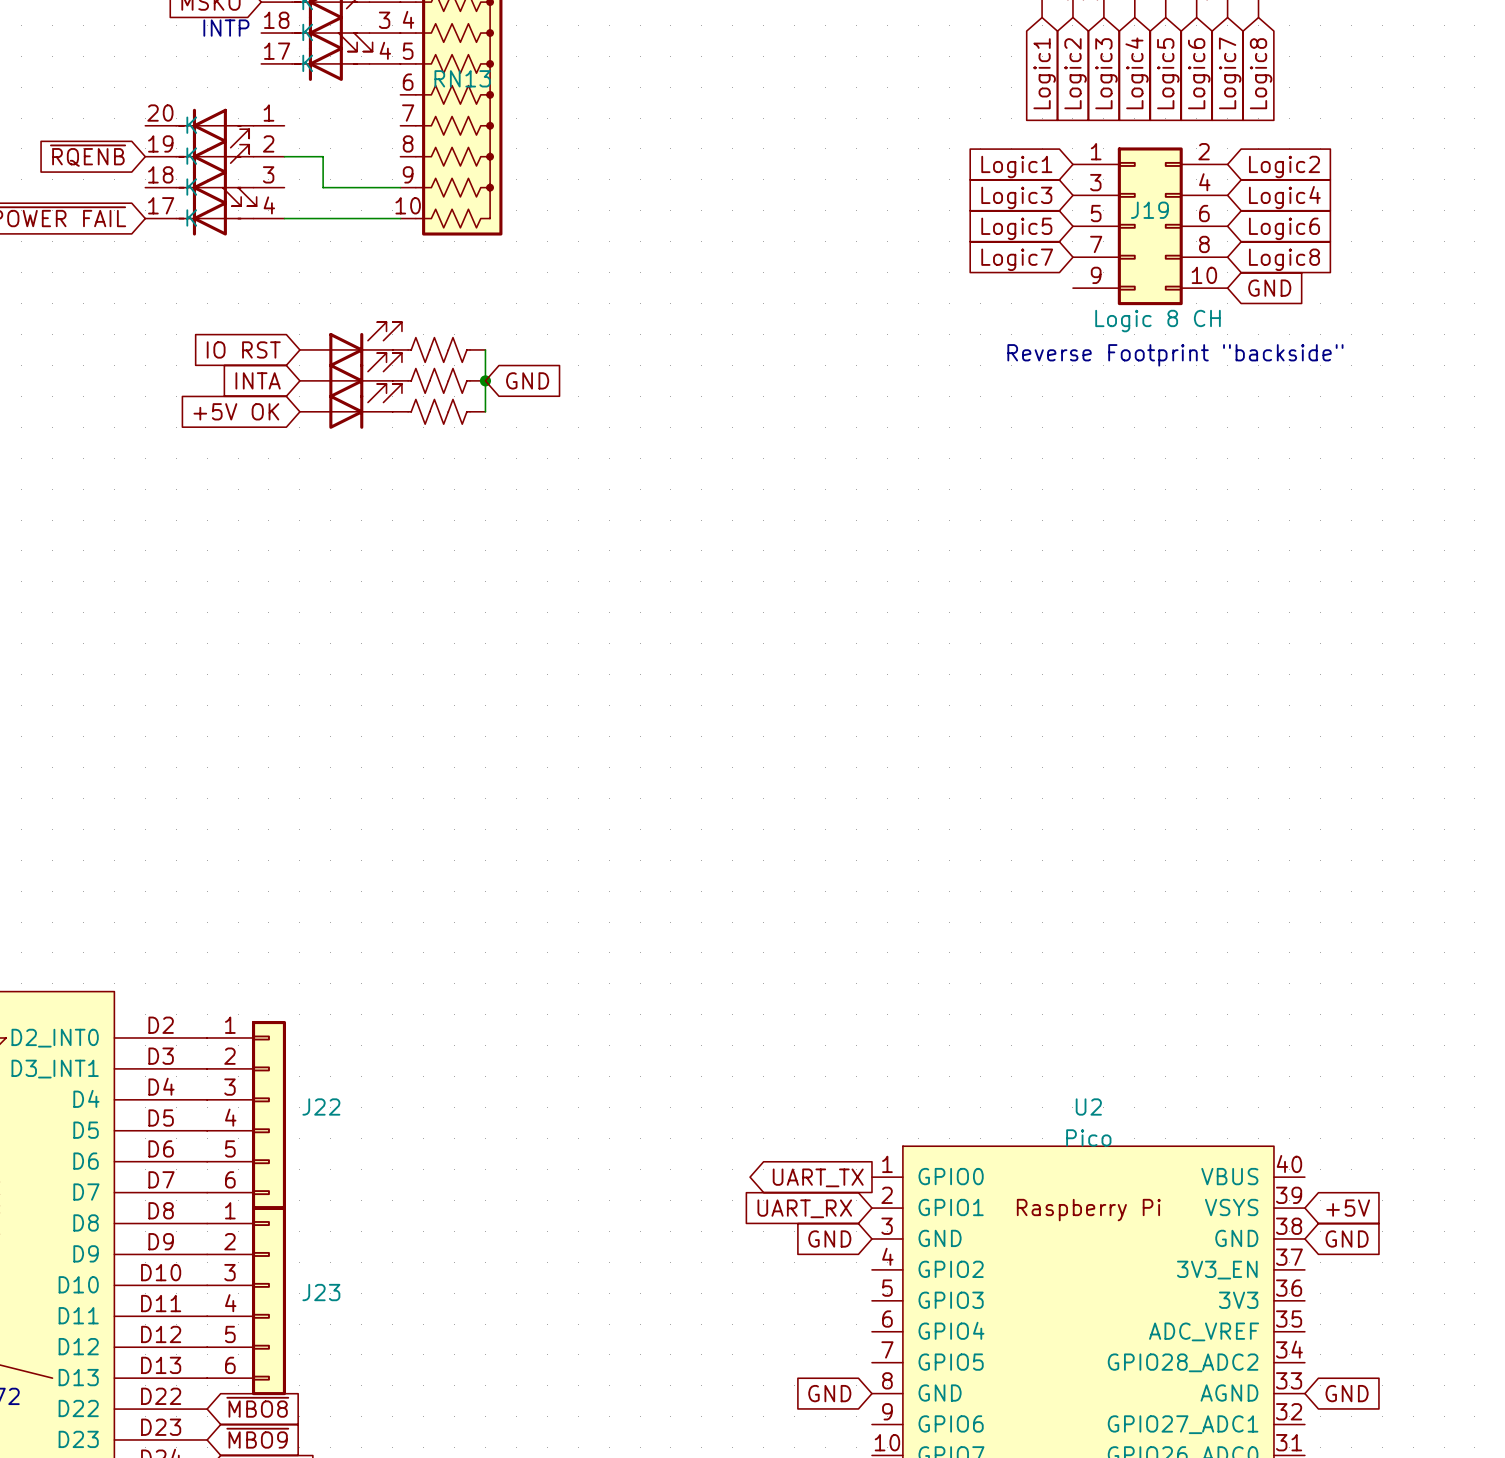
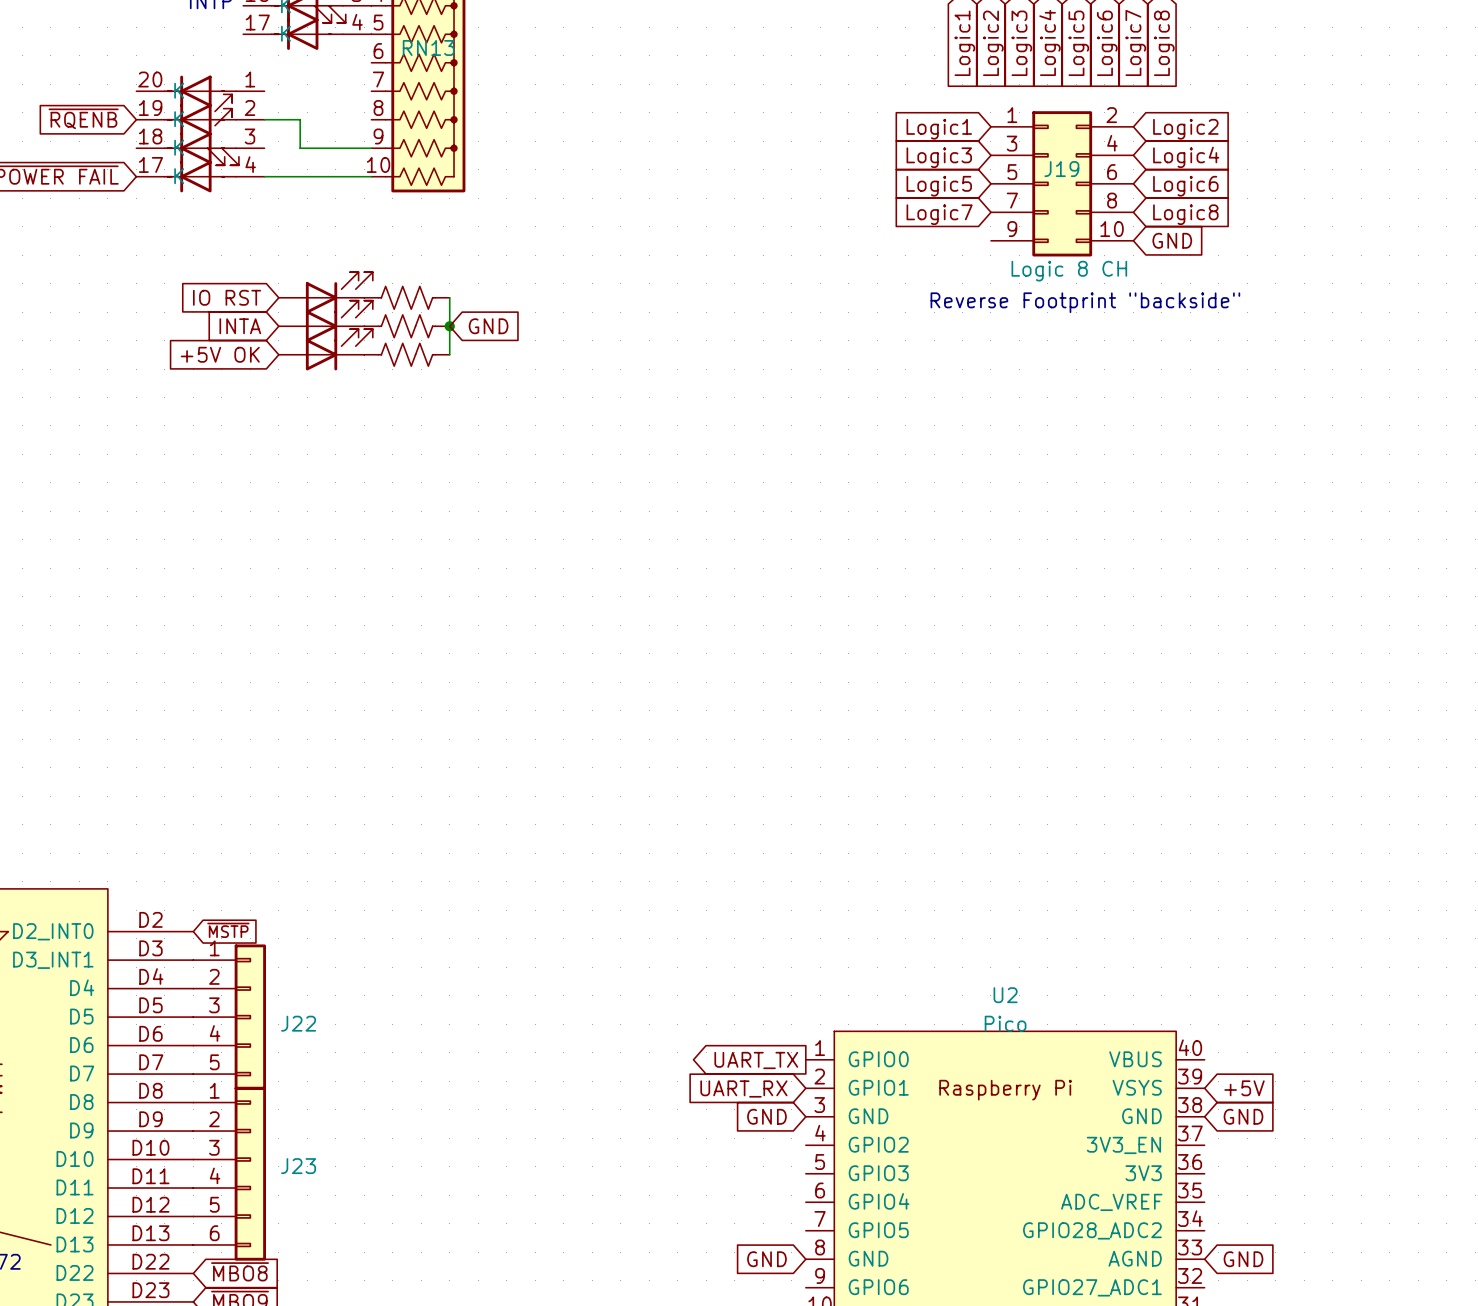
J22 symbol: [207, 1020, 287, 1210] -> [193, 944, 266, 1090]
global label: none -> ~{MSTP} (228, 930)

